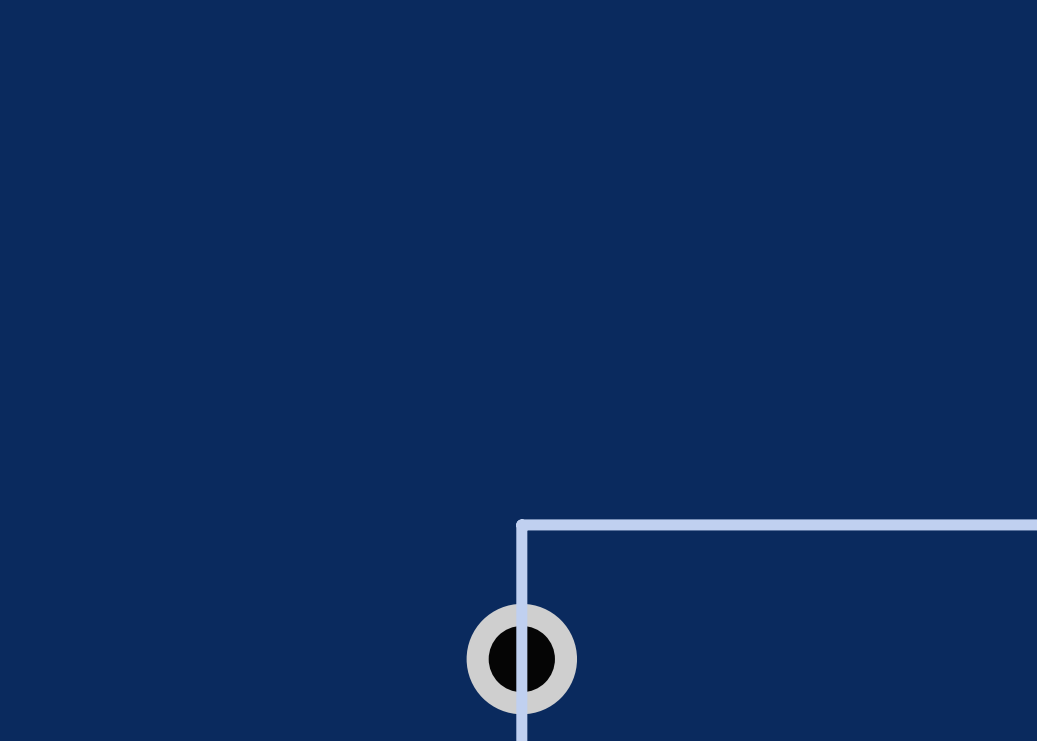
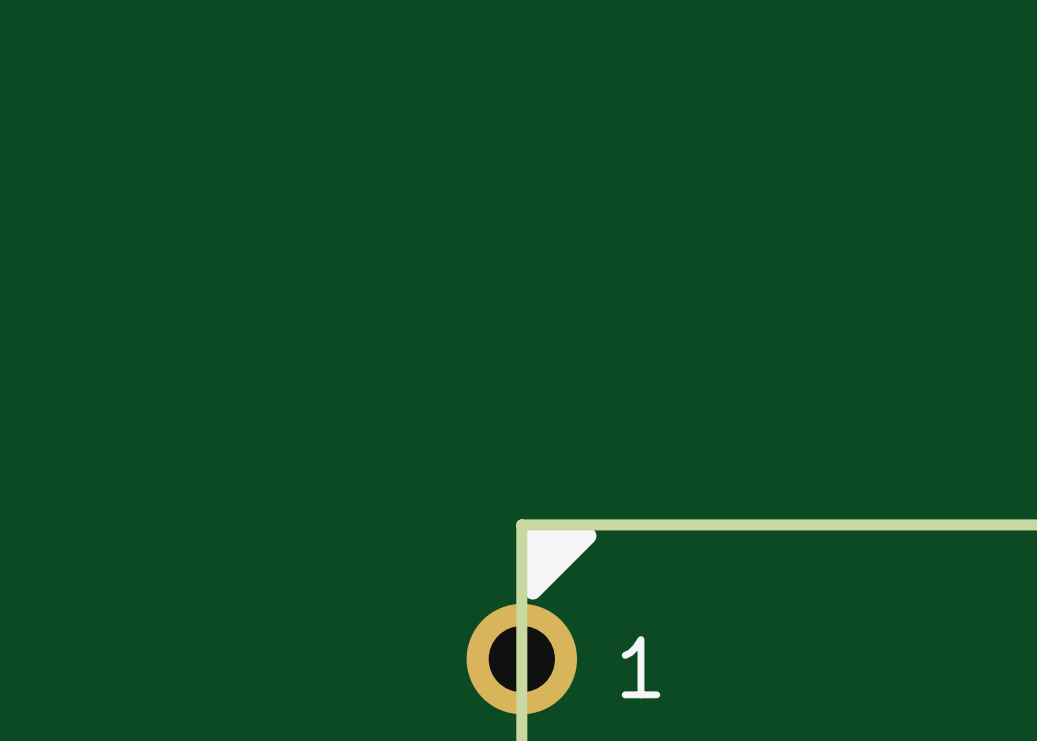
drawing: none -> [524, 527, 597, 600]
text: none -> 1 (640, 667)

